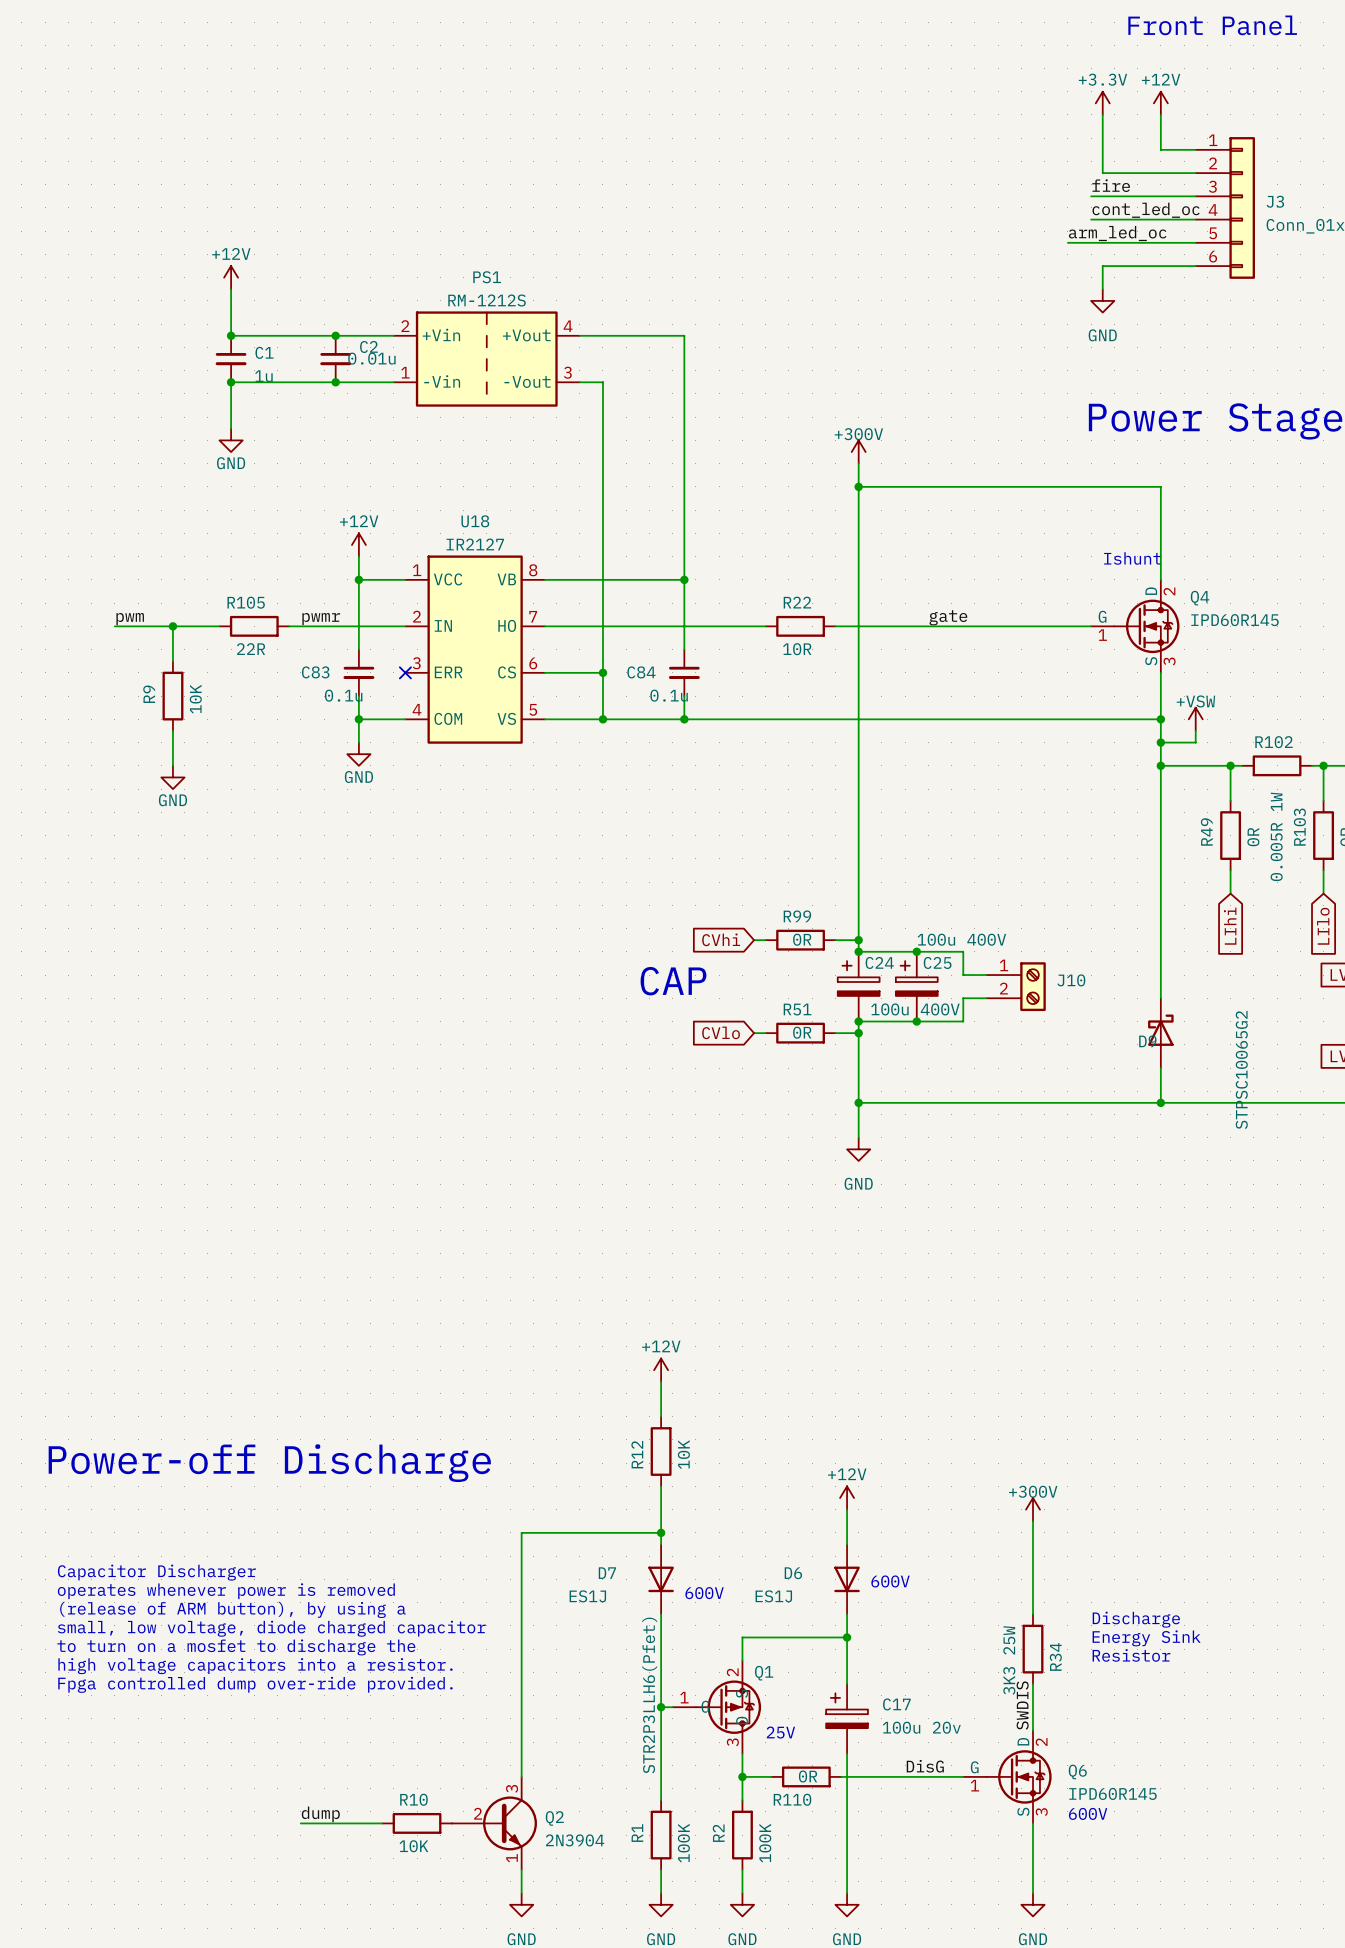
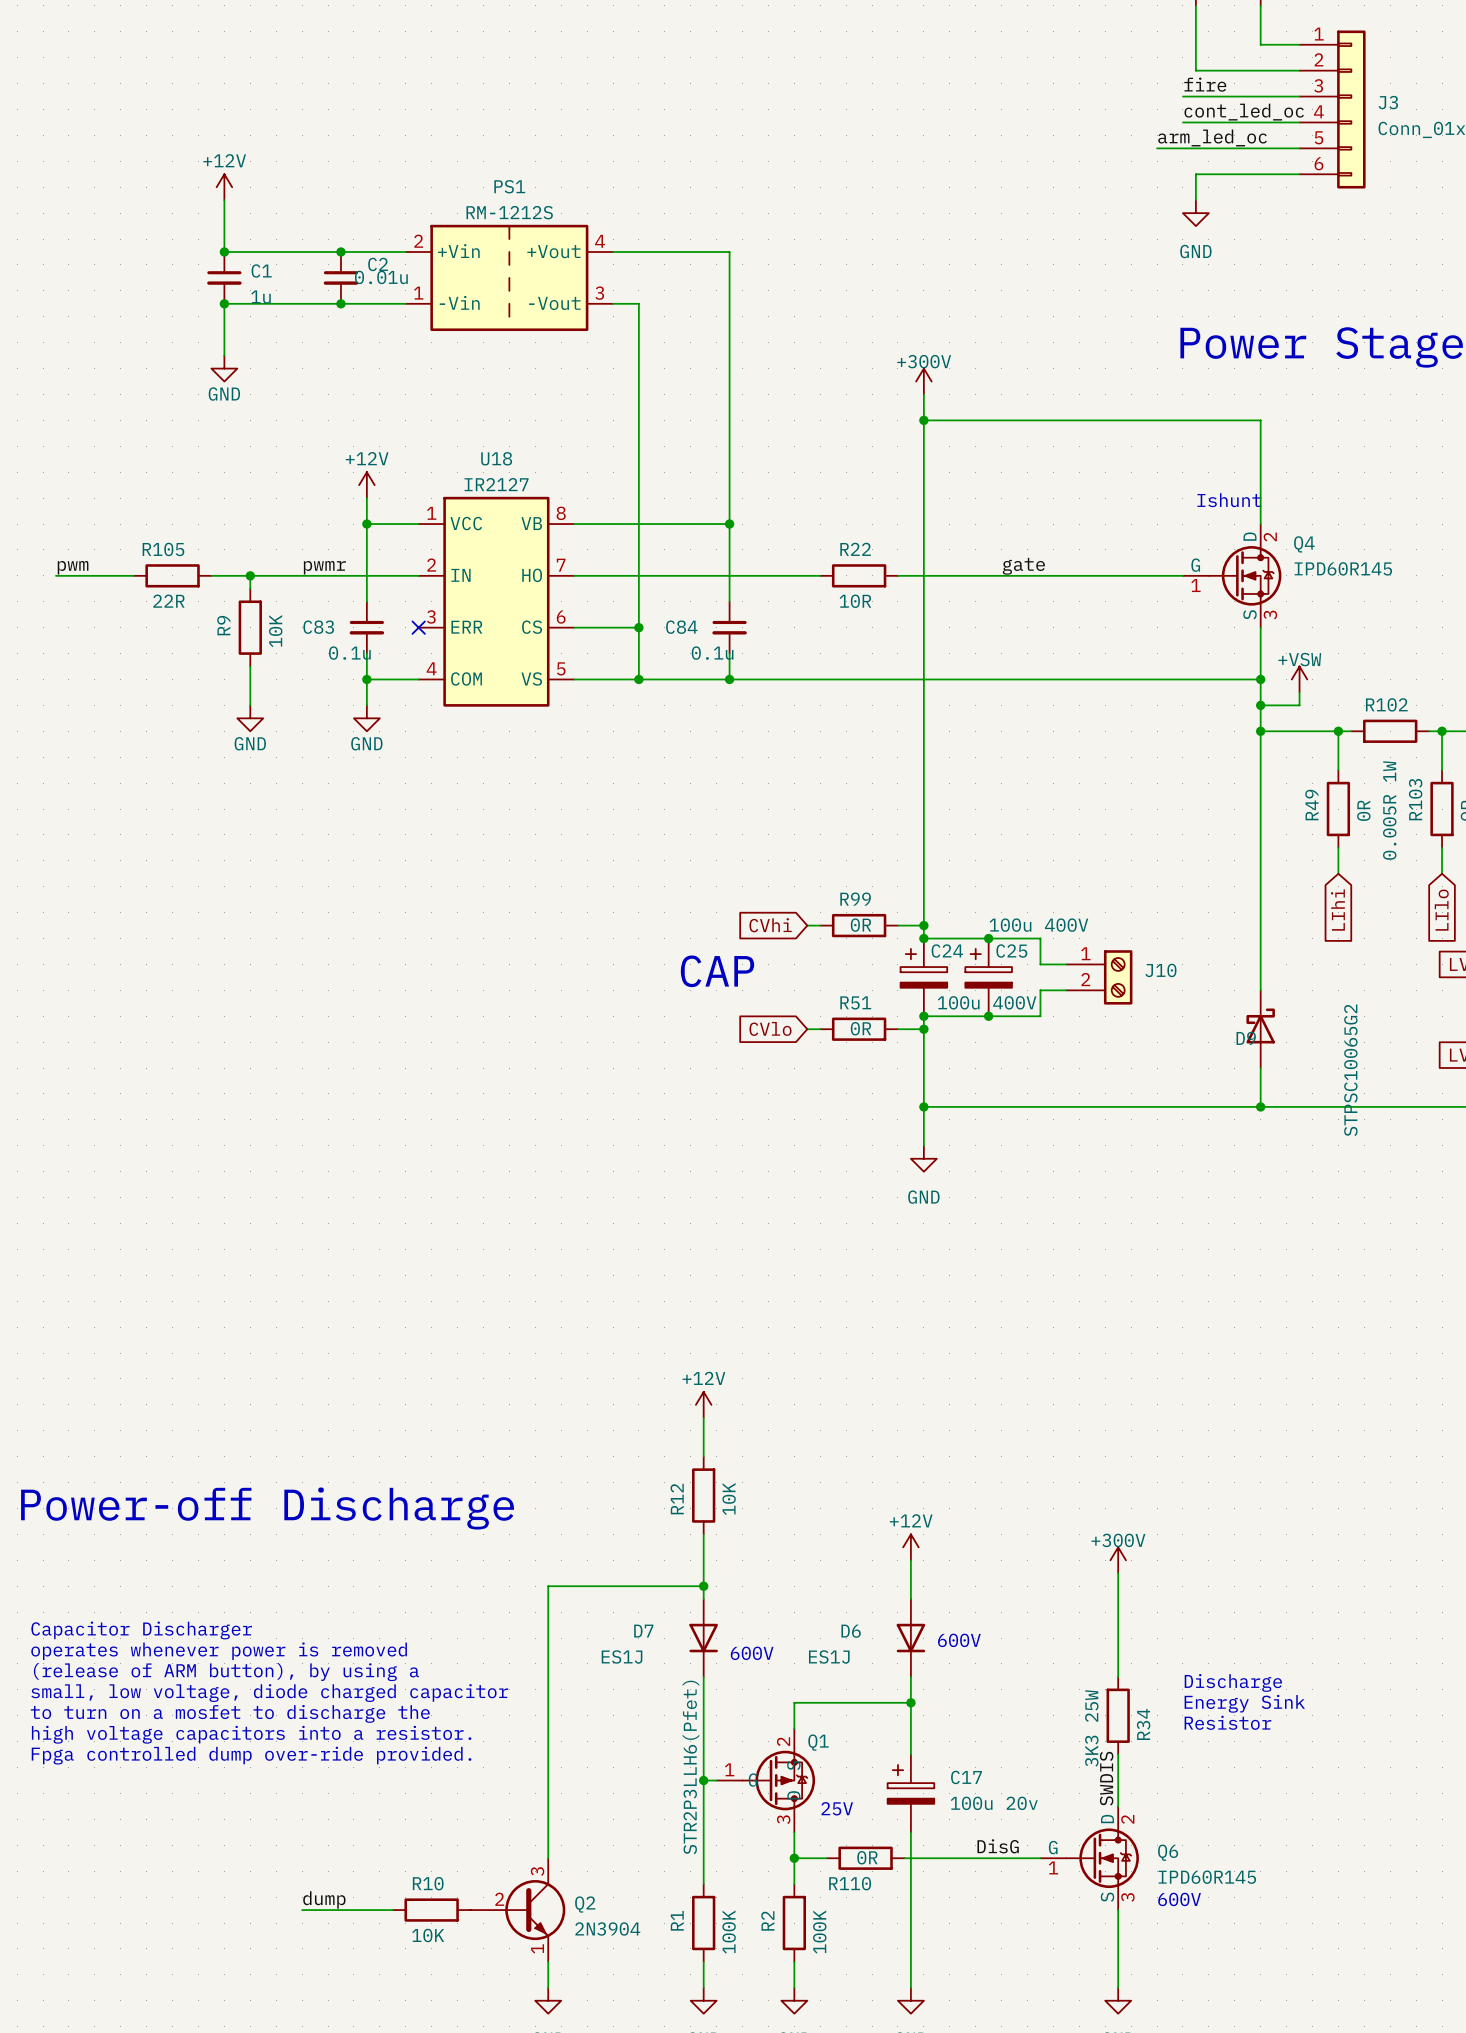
label position: pwm (130, 619) -> pwm (73, 567)
wire: none -> (55, 575) (94, 575)
wire: (149, 626) (219, 626) -> (289, 575) (211, 575)
wire: (172, 626) (172, 661) -> none
junction: (172, 626) -> none
wire: none -> (250, 575) (250, 588)
junction: none -> (250, 575)
R105 position: (254, 626) -> (172, 575)
R9 position: (172, 696) -> (250, 627)
wire: (172, 730) (172, 765) -> (250, 666) (250, 705)
power symbol position: GND (172, 777) -> GND (250, 718)

